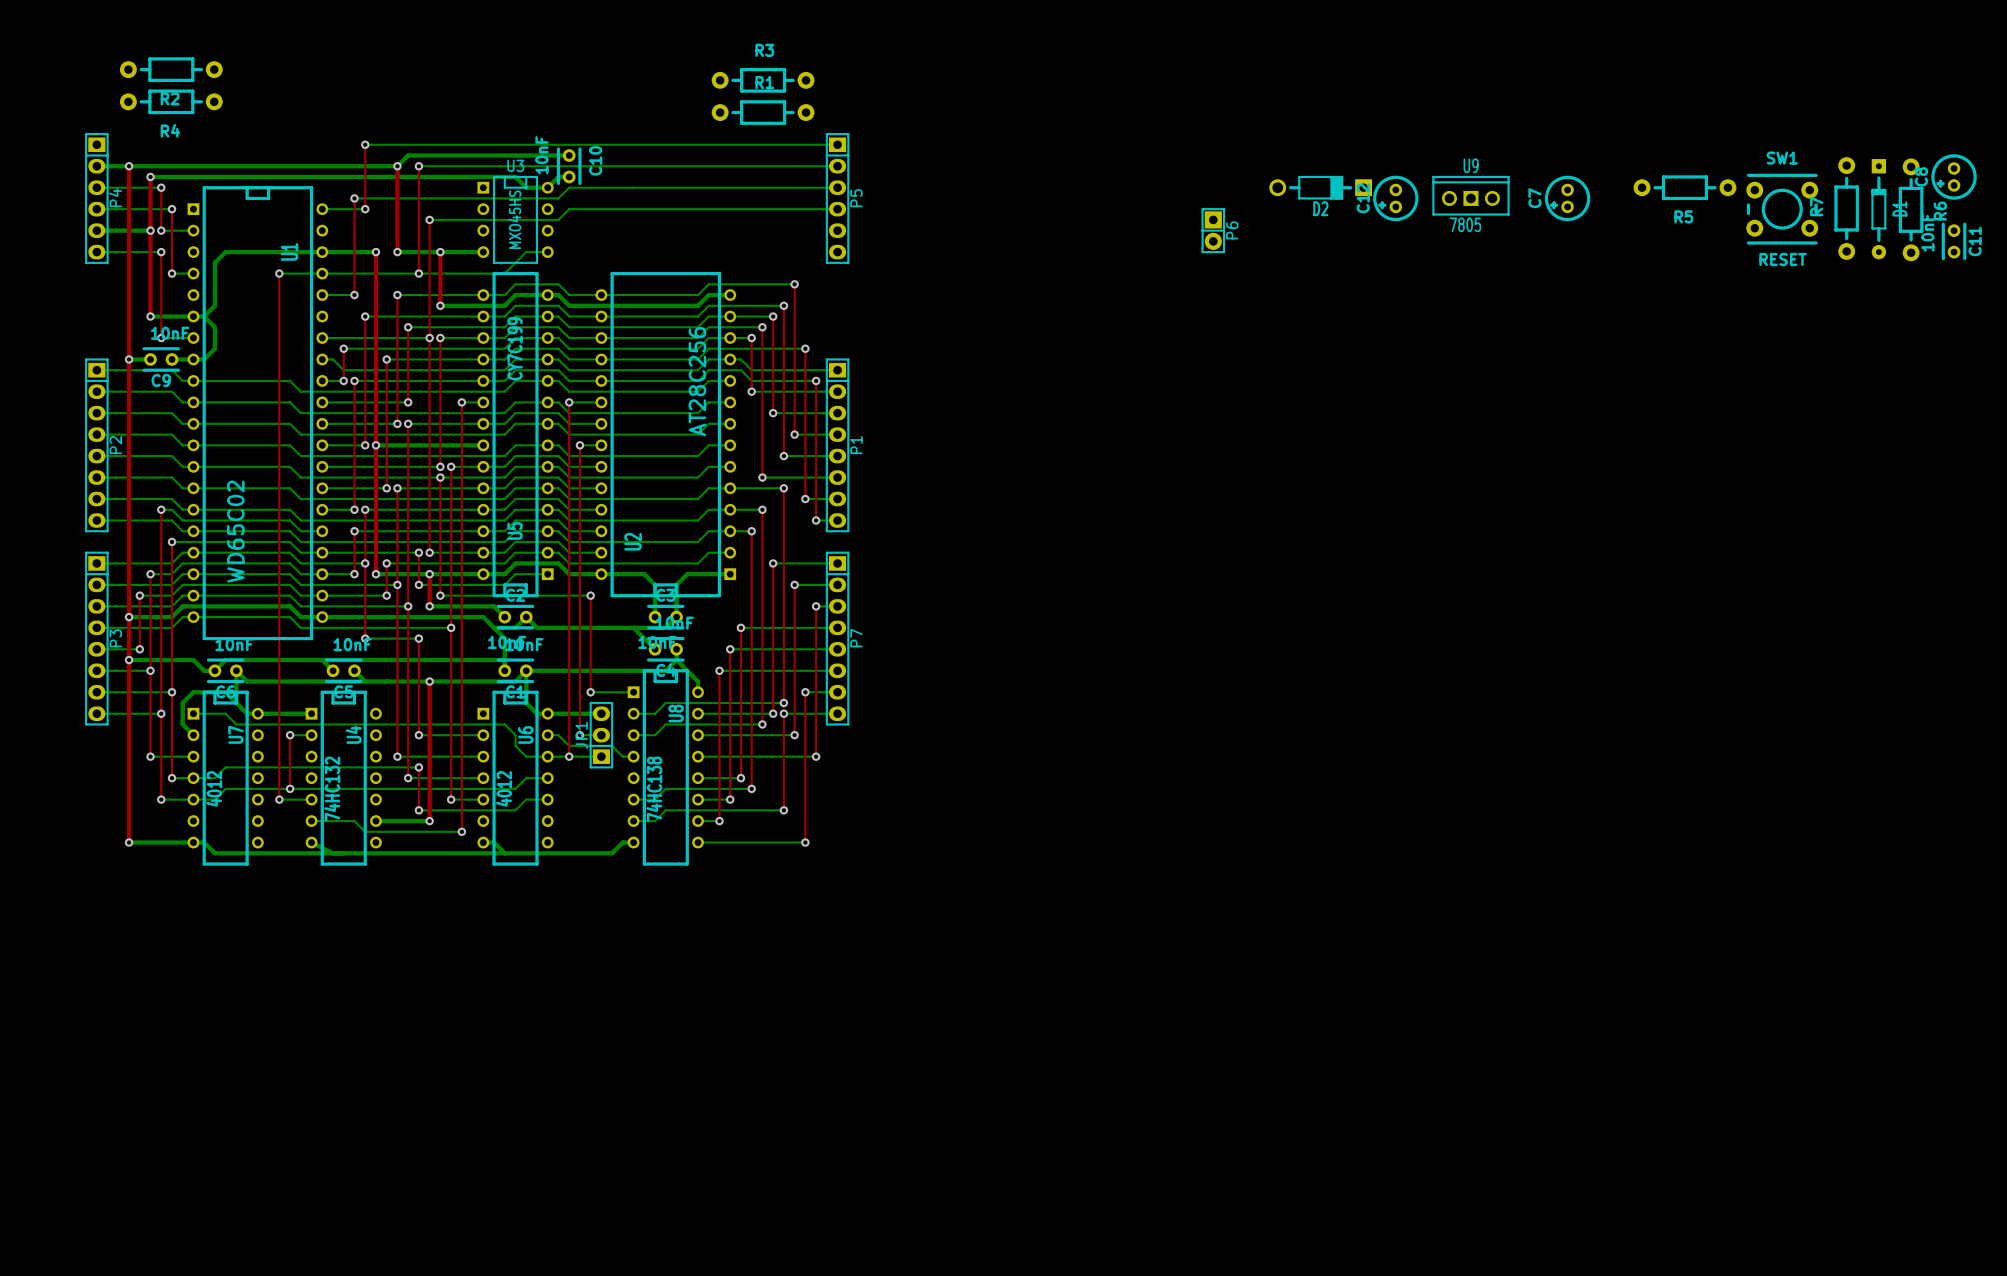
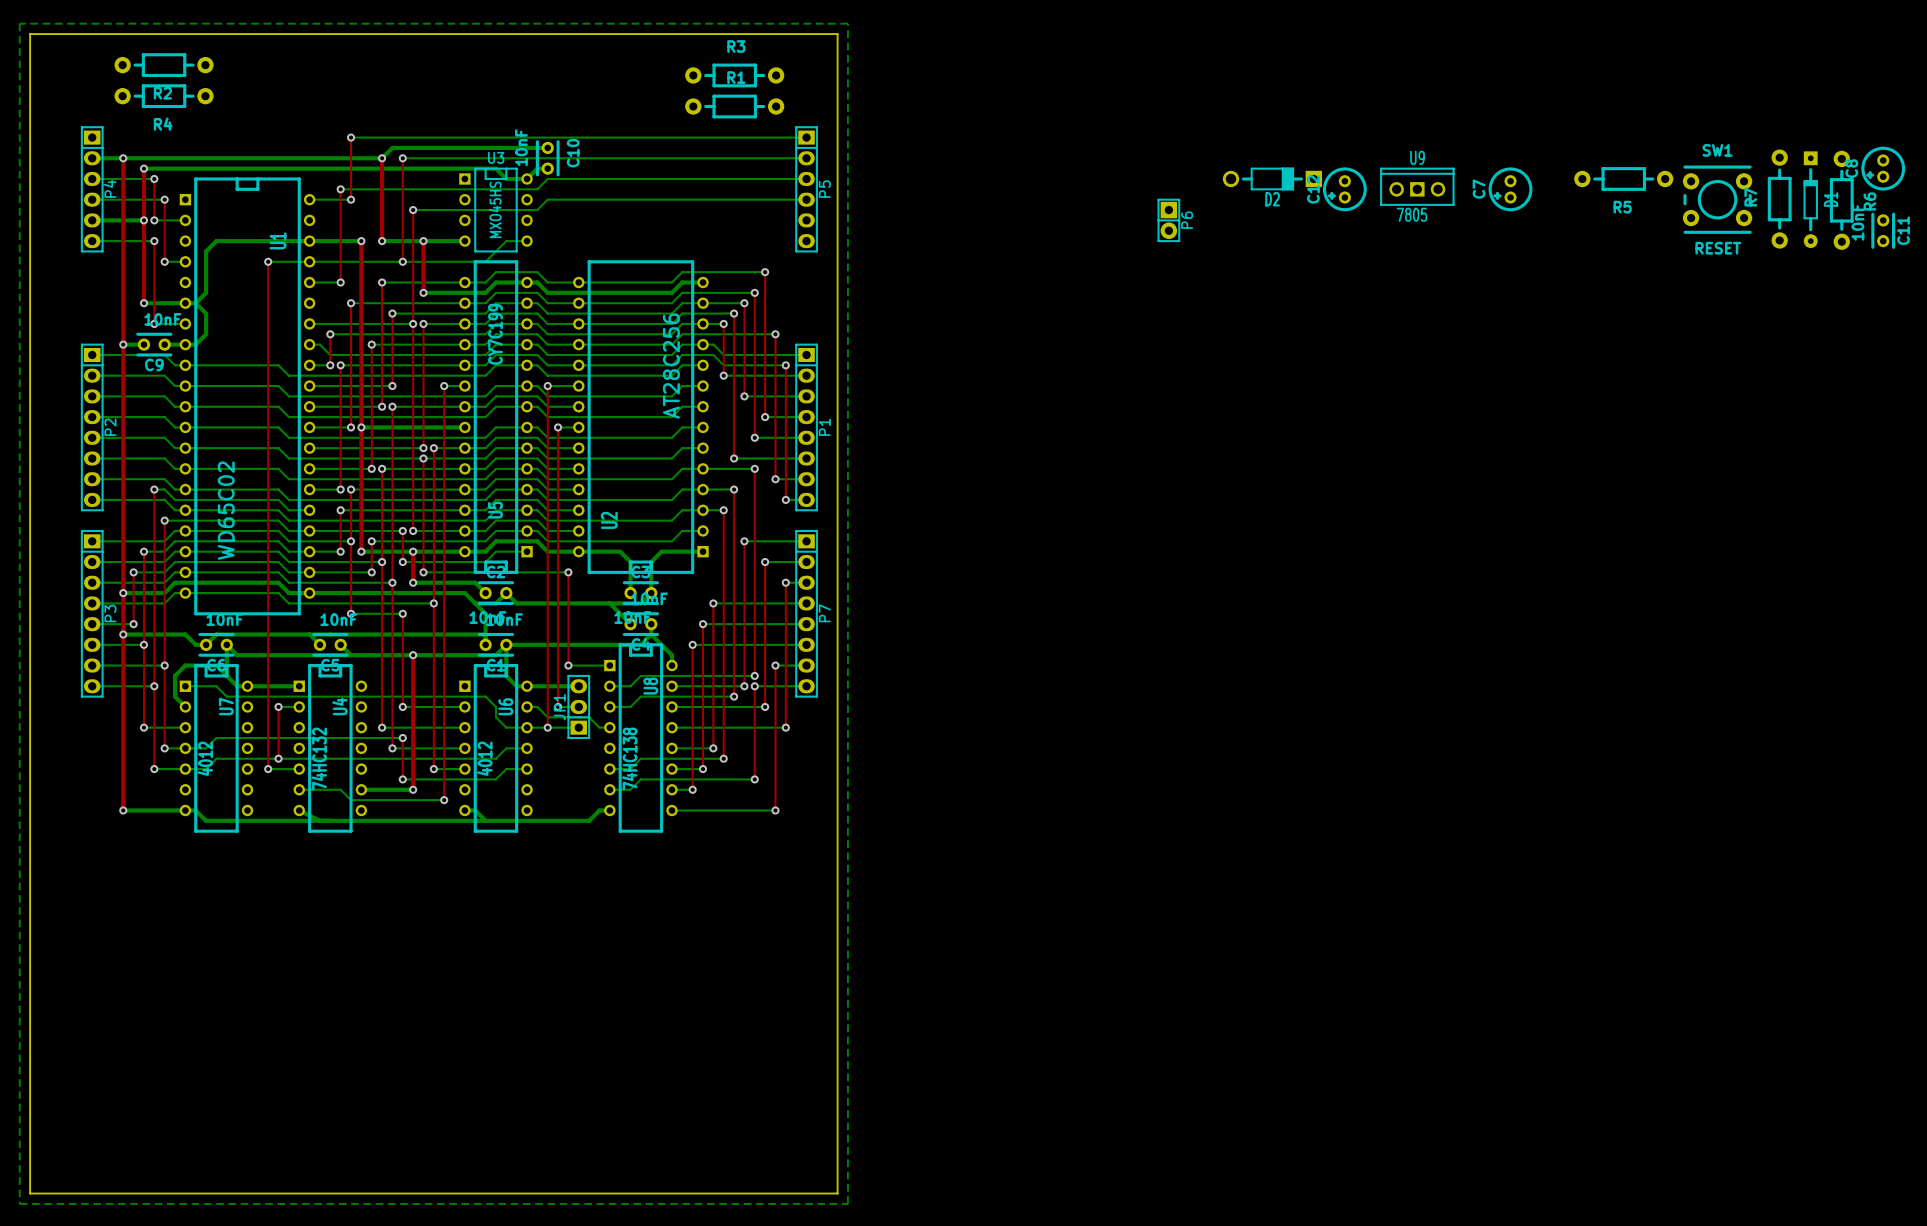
bottom zone outline: none -> (19, 23) (19, 1203) (847, 1203) (847, 23) (19, 23)
board edge: none -> (30, 34) (837, 34) (837, 1193) (30, 1193) (30, 34)

